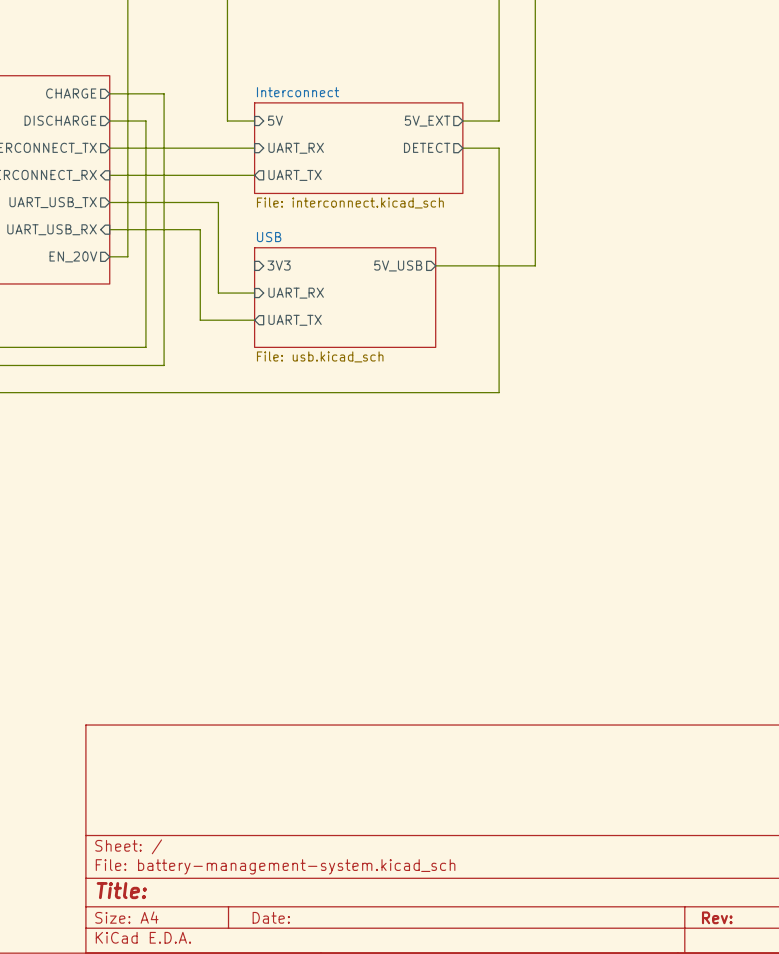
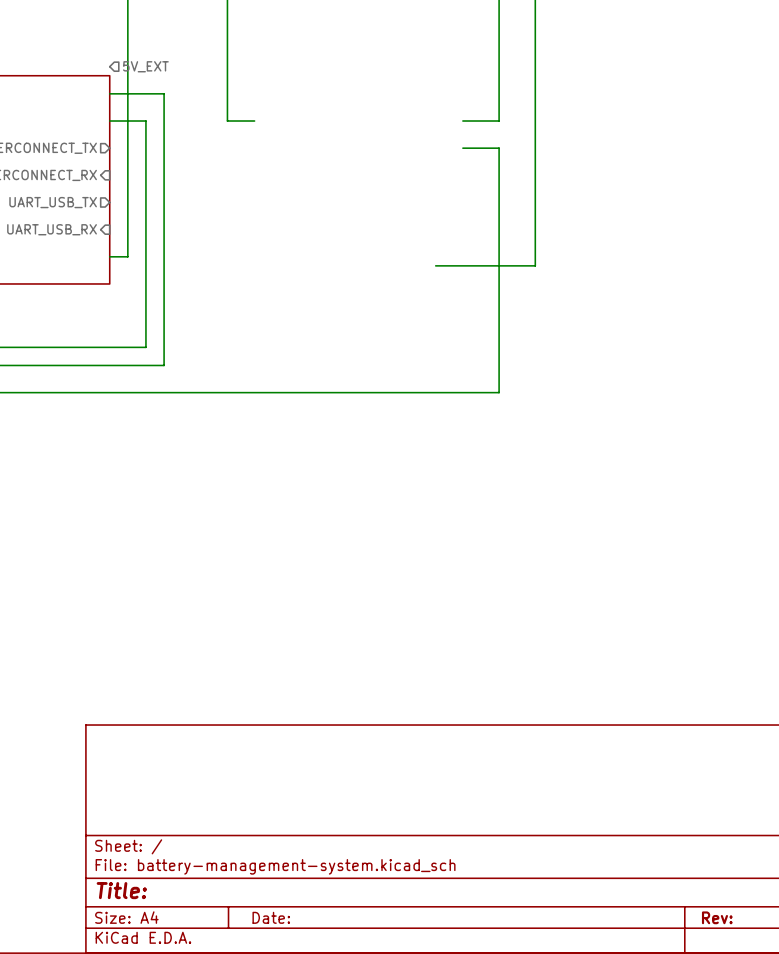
sheet pin: none -> 5V_EXT (145, 66)
sheet pin: CHARGE (71, 93) -> none
sheet pin: DISCHARGE (60, 120) -> none
sheet pin: 5V (275, 120) -> none
sheet pin: 5V_EXT (427, 121) -> none
sheet pin: DETECT (427, 147) -> none
wire: (109, 148) (254, 148) -> none
sheet pin: UART_RX (296, 148) -> none
sheet Interconnect: File: interconnect.kicad_sch (358, 148) -> none
wire: (109, 175) (254, 175) -> none
sheet pin: UART_TX (295, 175) -> none
wire: (109, 202) (218, 202) (218, 293) (254, 293) -> none
wire: (109, 229) (200, 229) (200, 320) (254, 320) -> none
sheet pin: EN_20V (73, 256) -> none
sheet pin: 3V3 (279, 265) -> none
sheet pin: 5V_USB (398, 265) -> none
sheet pin: UART_RX (296, 293) -> none
sheet USB: File: usb.kicad_sch (345, 297) -> none
sheet pin: UART_TX (295, 320) -> none

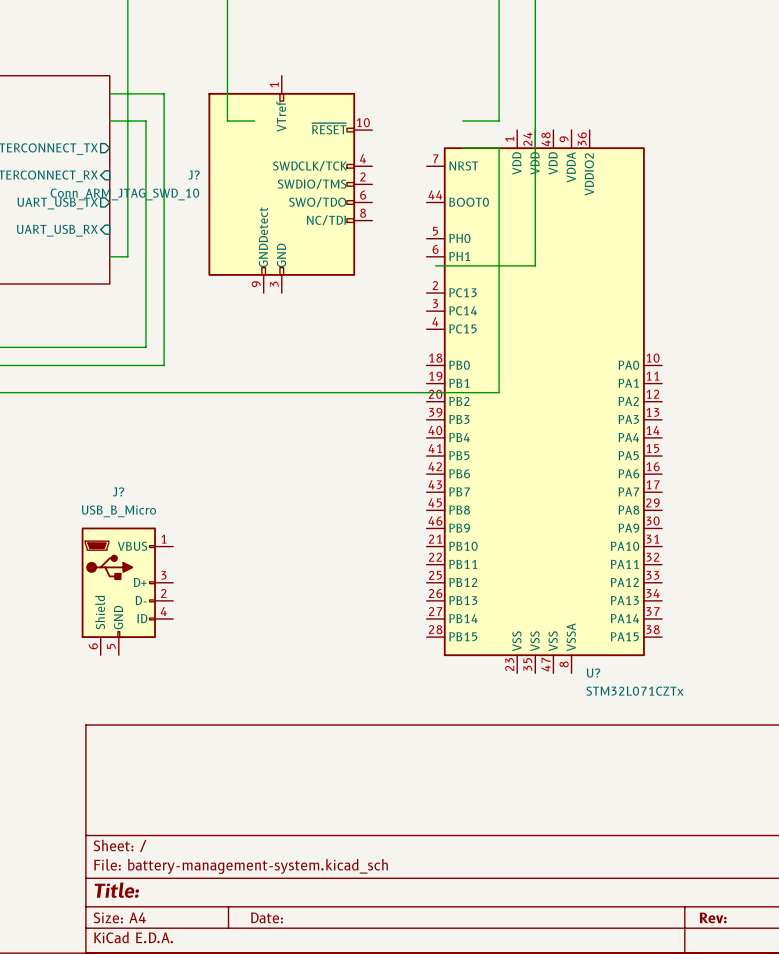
sheet pin: 5V_EXT (145, 66) -> none
J?: none -> Conn_ARM_JTAG_SWD_10 (290, 184)
U?: none -> STM32L071CZTx (544, 401)
J?: none -> USB_B_Micro (127, 591)

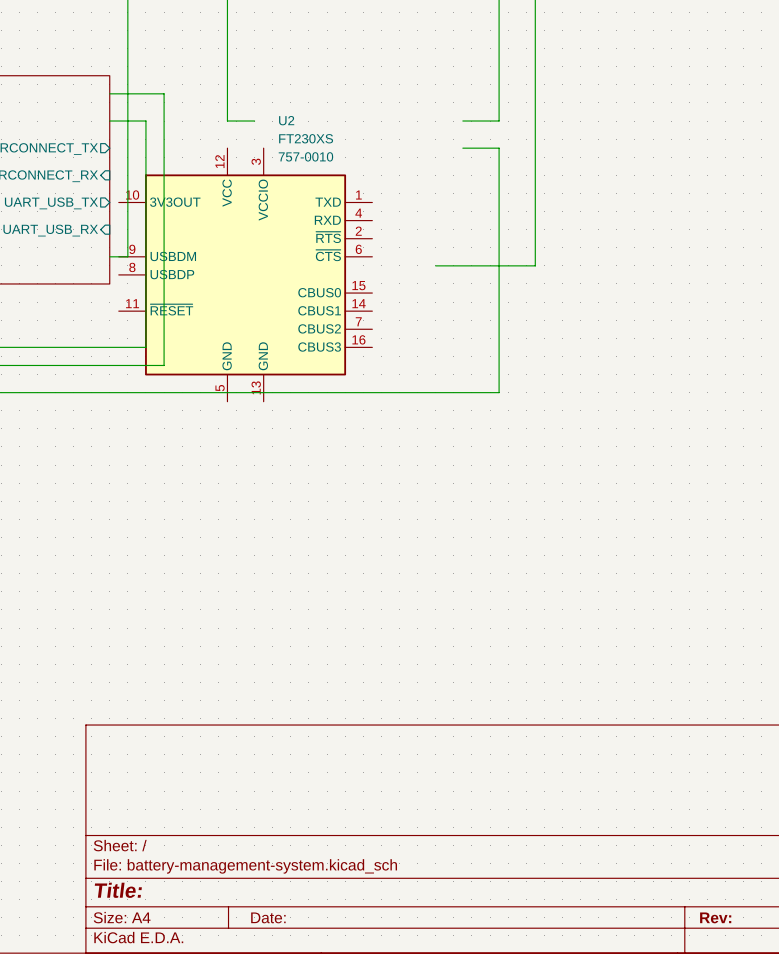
J?: Conn_ARM_JTAG_SWD_10 (290, 184) -> none
U2: none -> FT230XS (245, 274)
U?: STM32L071CZTx (544, 401) -> none
J?: USB_B_Micro (127, 591) -> none

